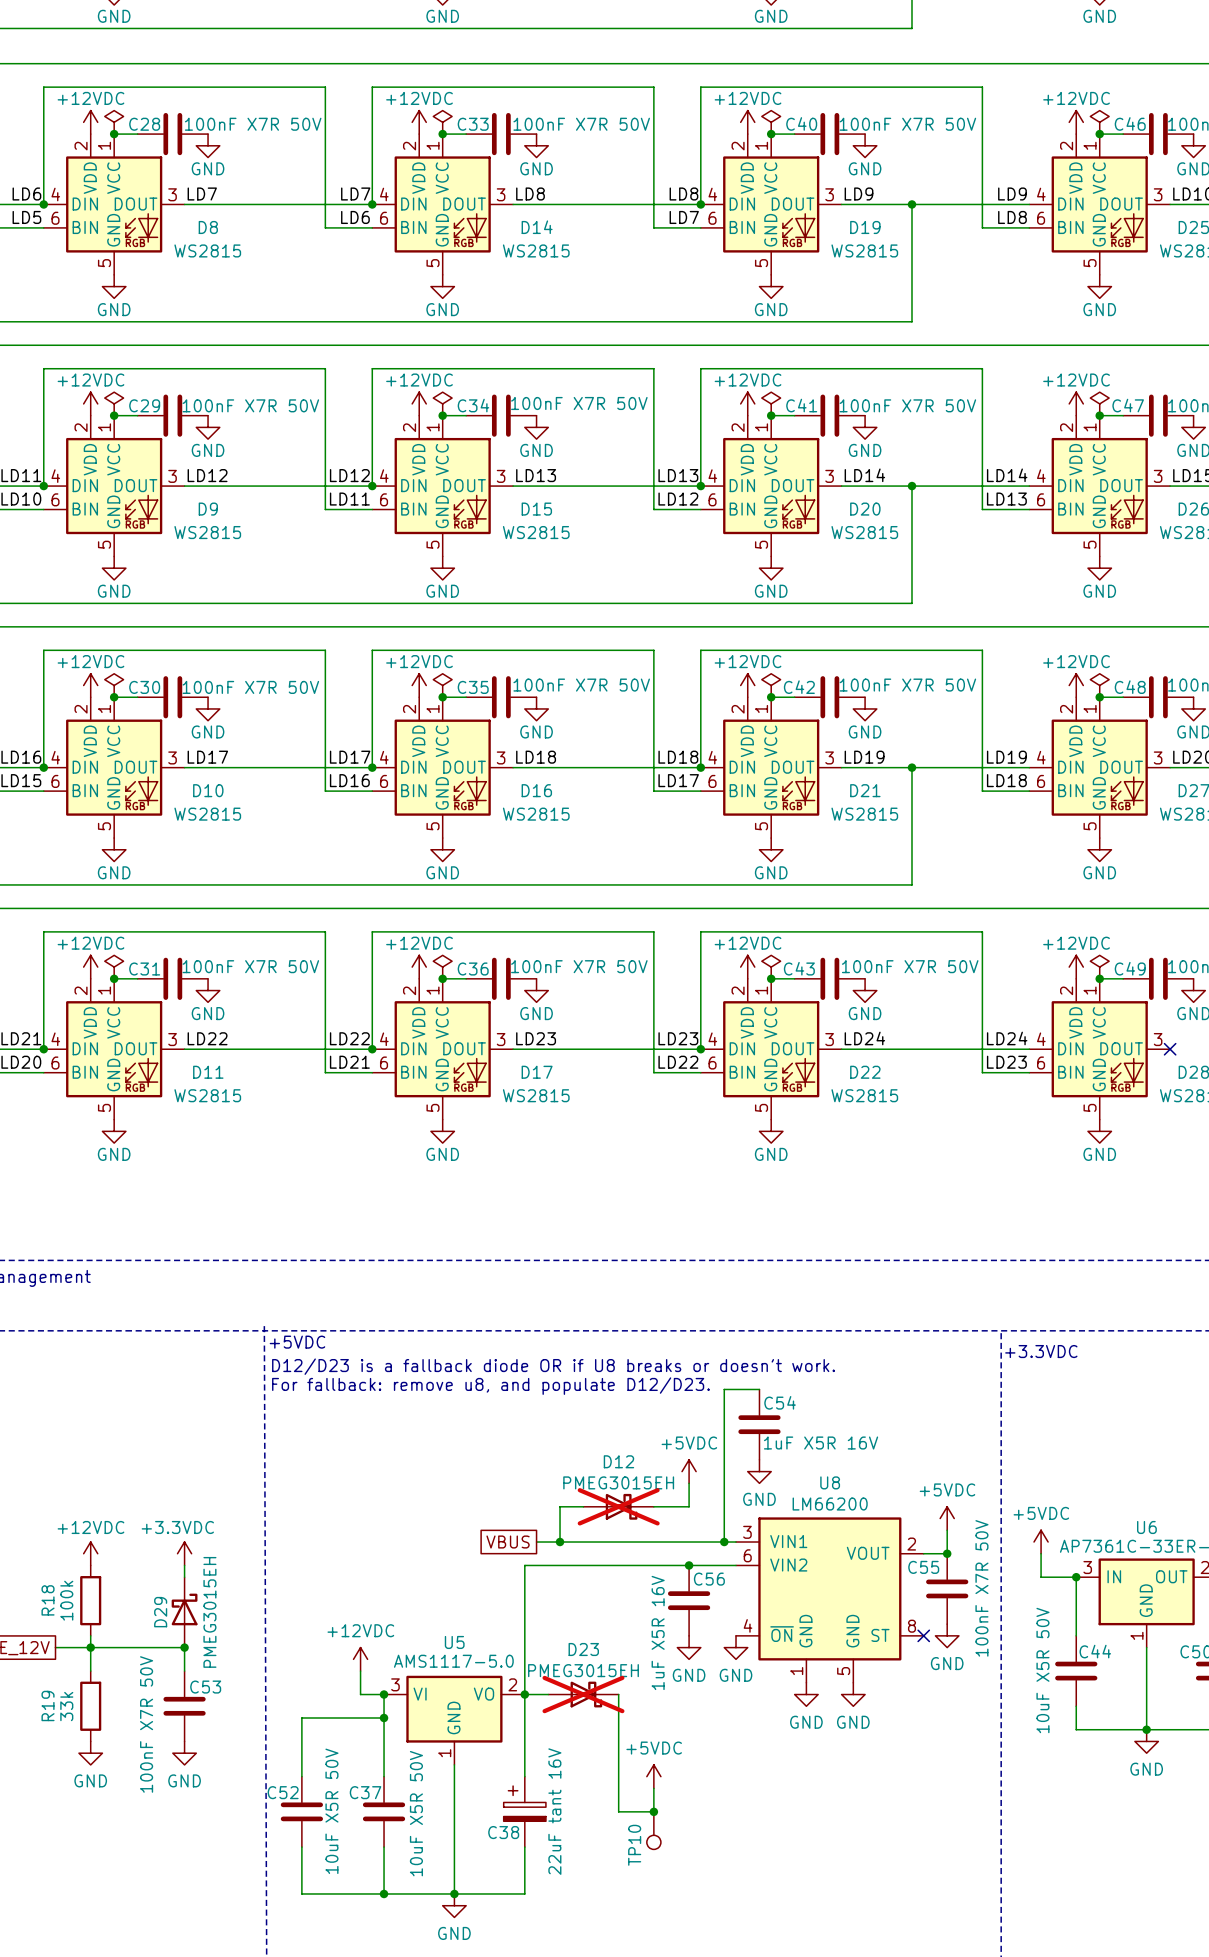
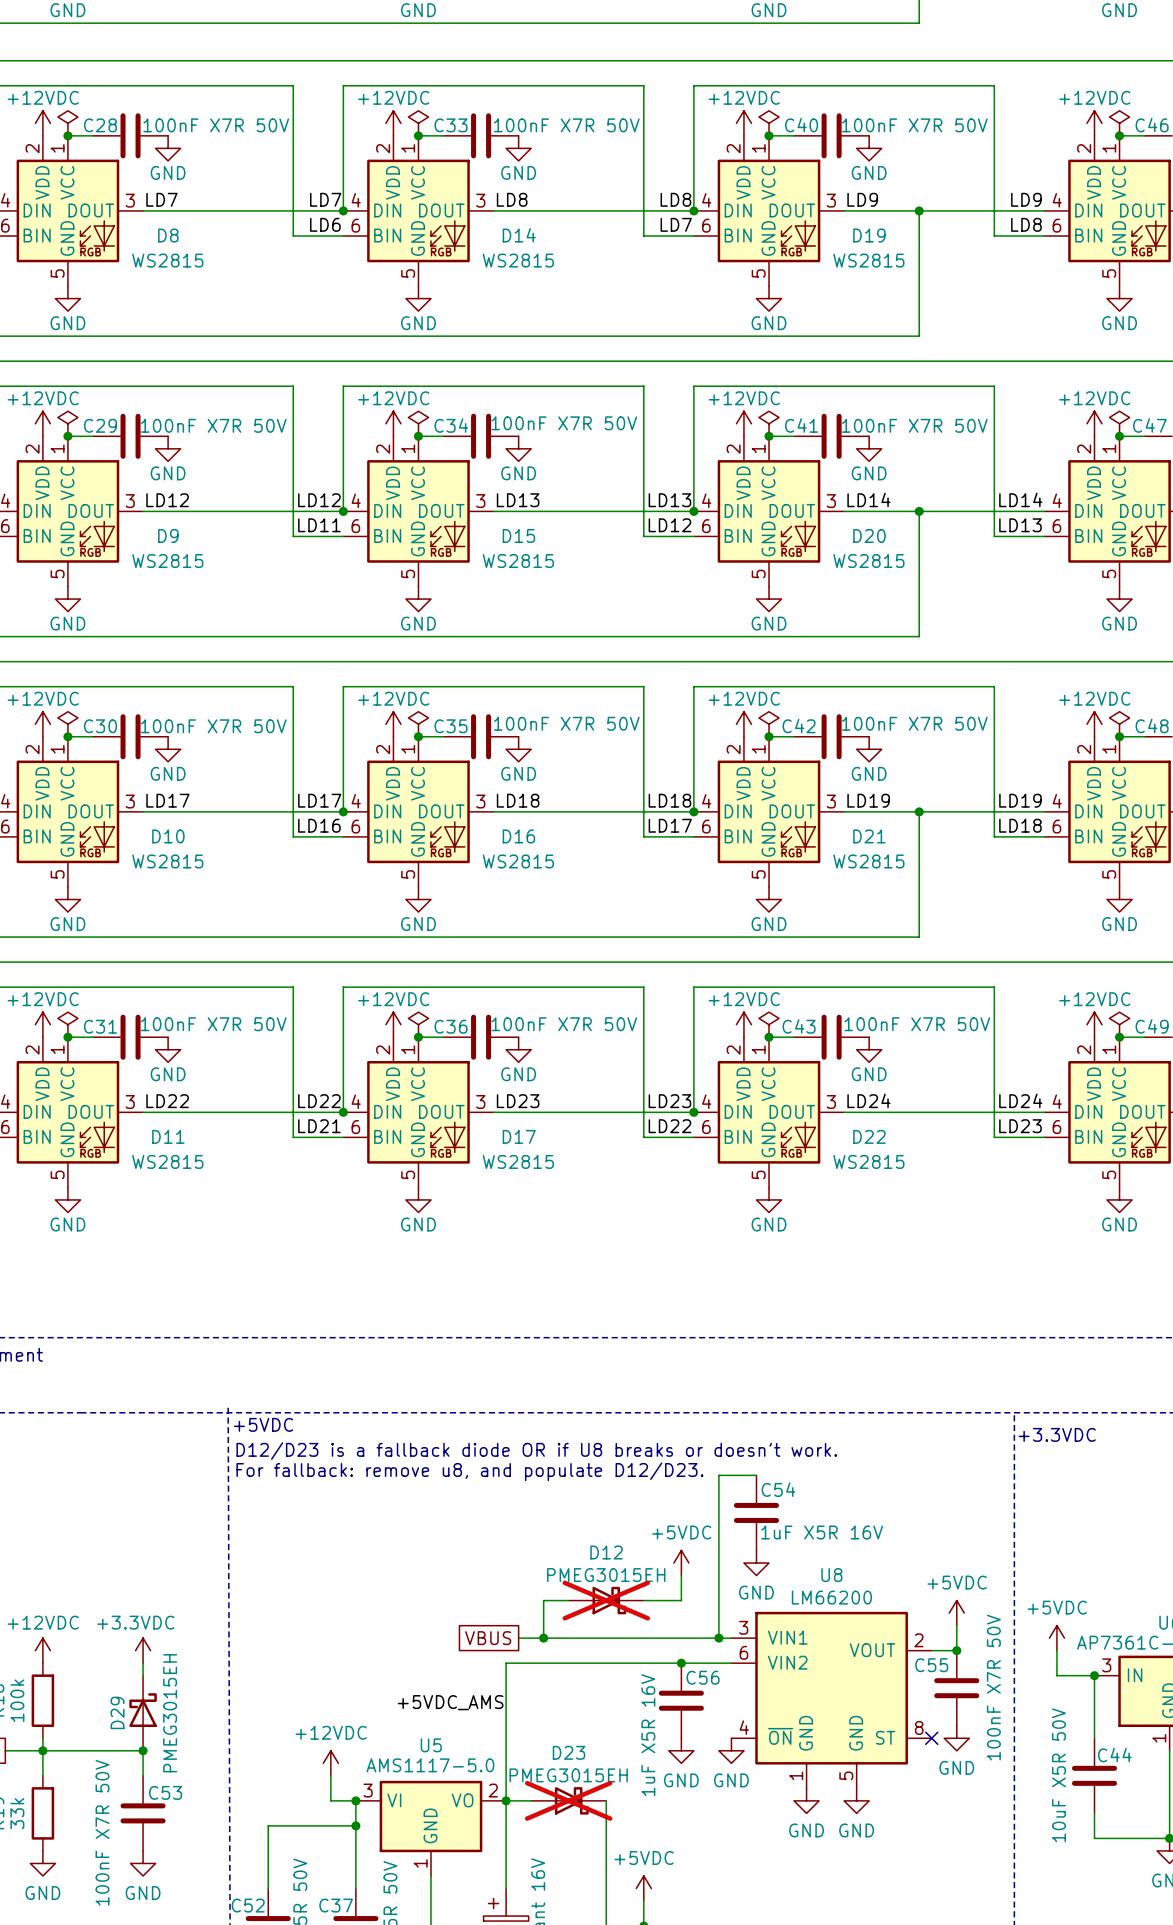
label: none -> +5VDC_AMS (450, 1702)

